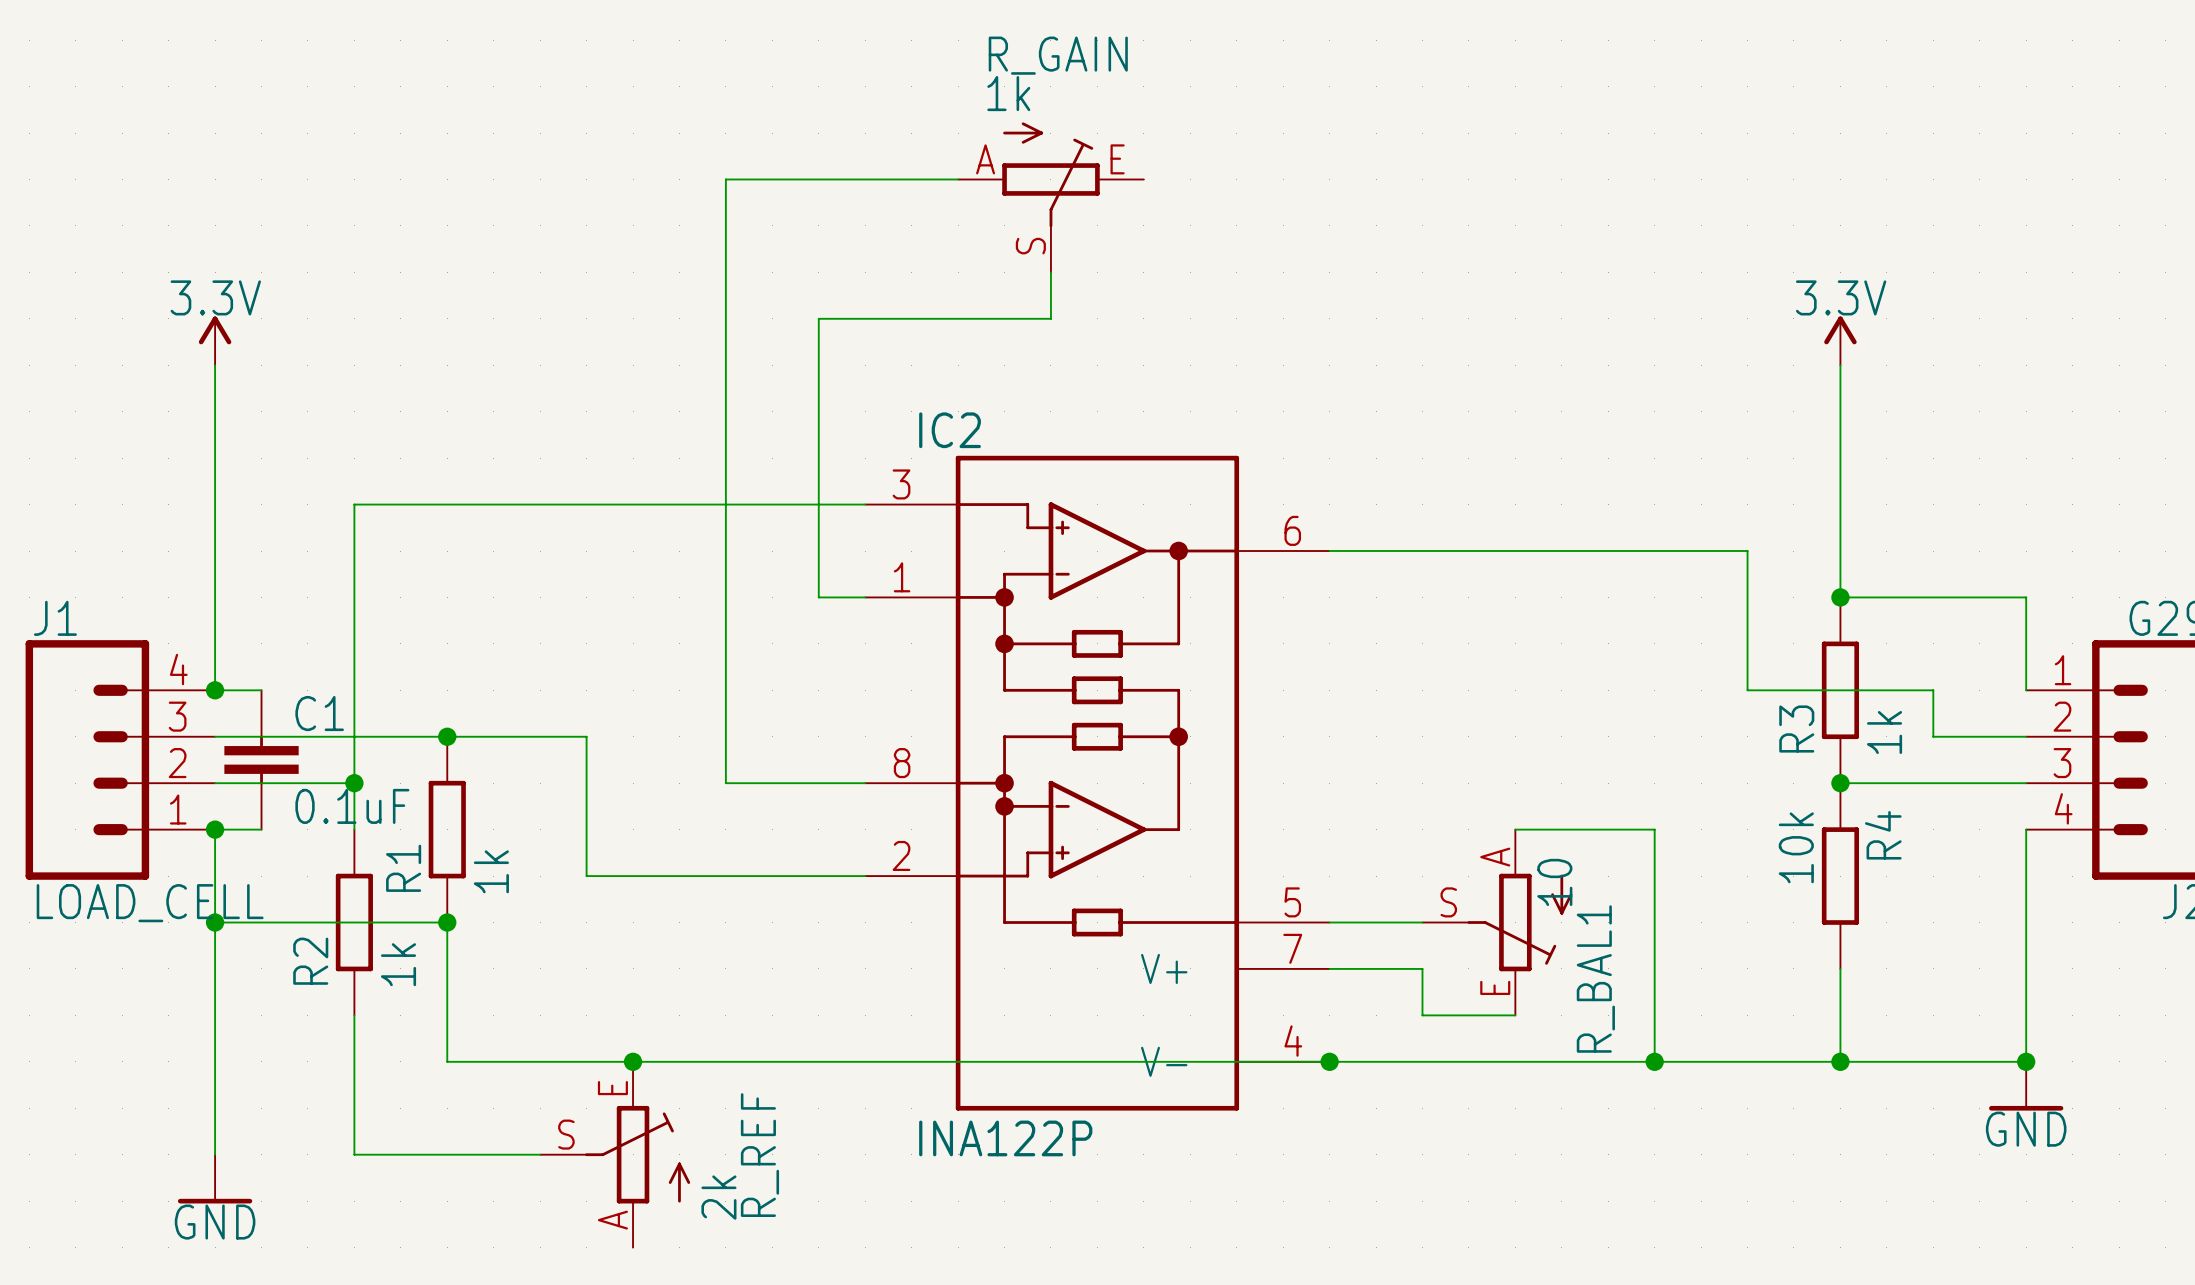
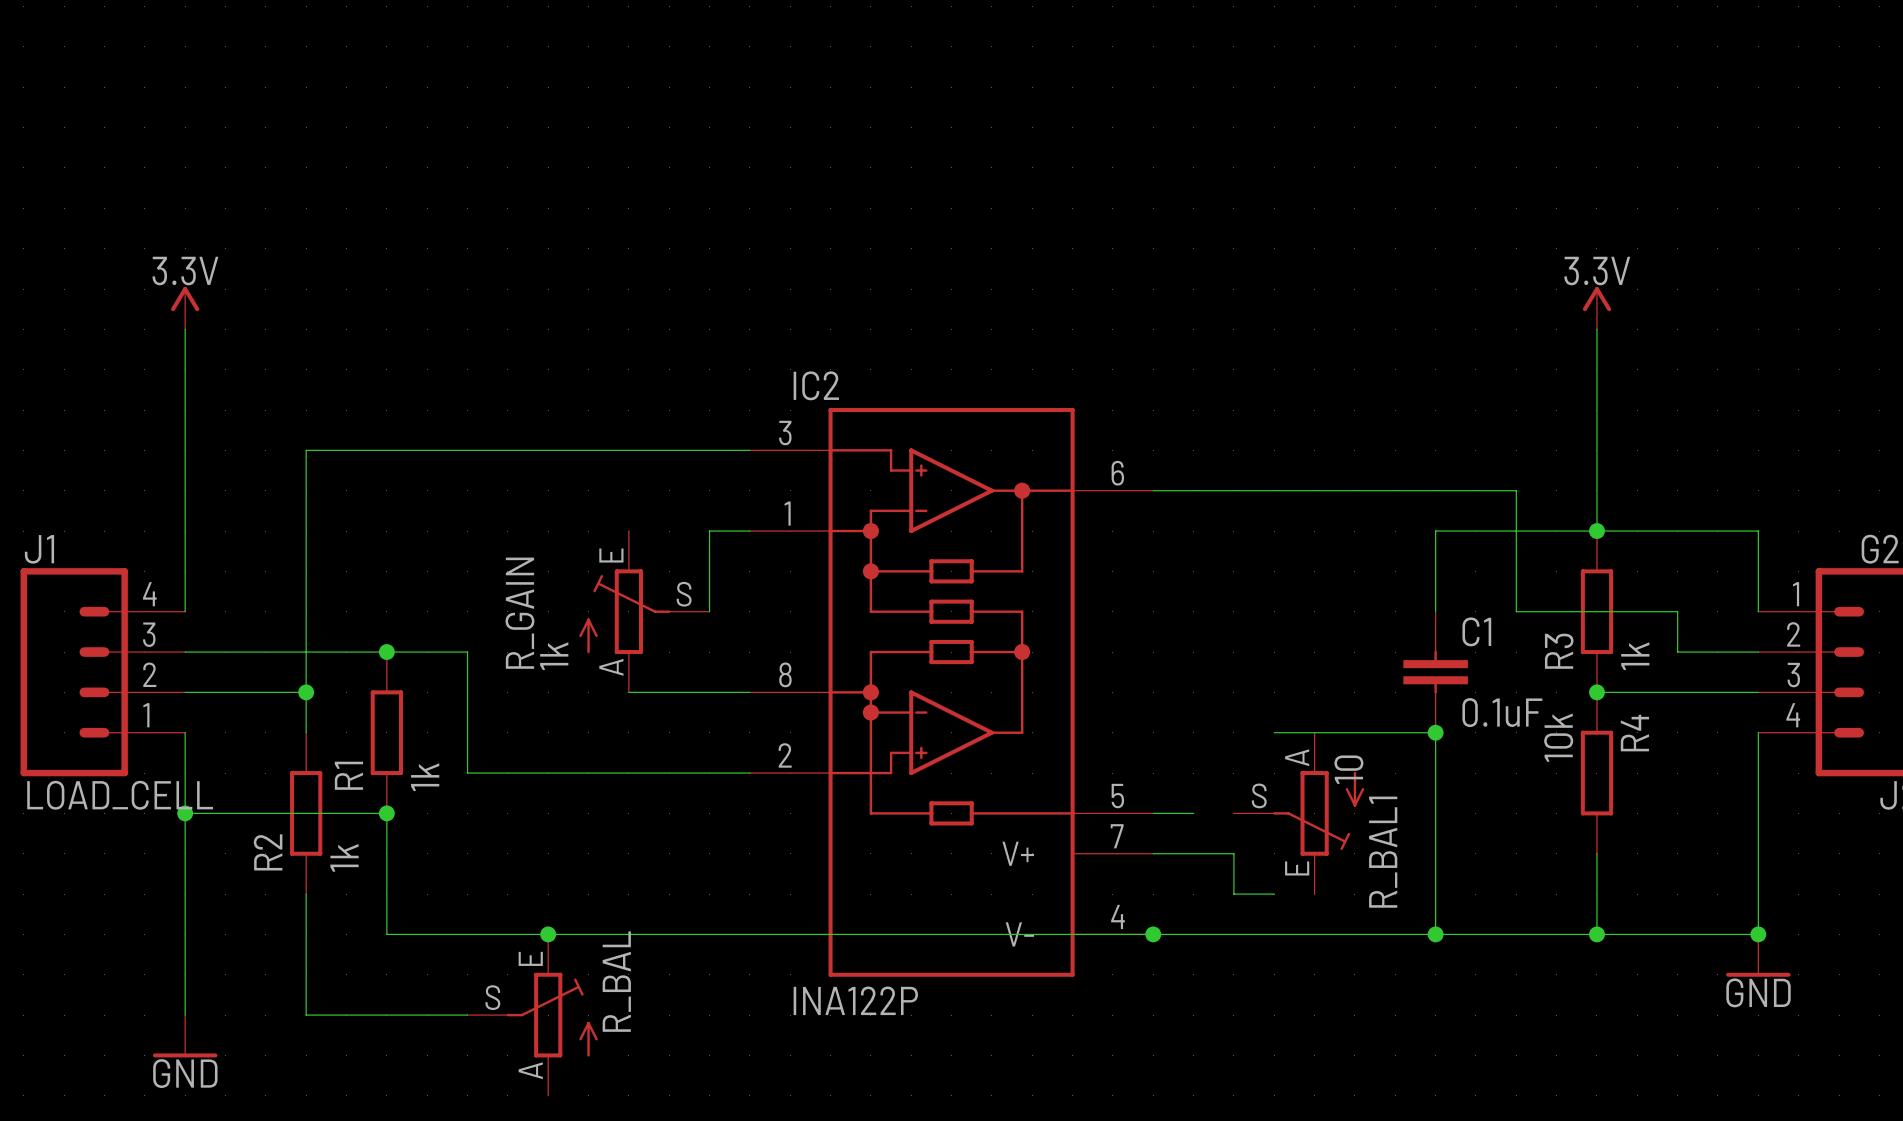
wire: (958, 179) (725, 179) (725, 783) -> none
R_GAIN: 1k (1050, 197) -> none
wire: (1050, 272) (1050, 318) (818, 318) (818, 597) -> (709, 611) (709, 531)
wire: none -> (1596, 531) (1435, 531) (1435, 611)
wire: (215, 690) (261, 690) -> none
junction: (215, 690) -> none
R_GAIN: none -> 1k (644, 611)
wire: (540, 736) (586, 736) (586, 876) -> (467, 652) (467, 773) (507, 773)
C1 position: (261, 759) -> (1435, 672)
wire: (215, 829) (261, 829) -> none
junction: (215, 829) -> none
junction: none -> (1435, 732)
wire: (1376, 922) (1422, 922) -> (1274, 732) (1314, 732)
wire: (1468, 1015) (1515, 1015) -> none
R_REF name: R_REF (759, 1155) -> R_BAL (616, 981)
R_REF value: 2k (718, 1197) -> none

